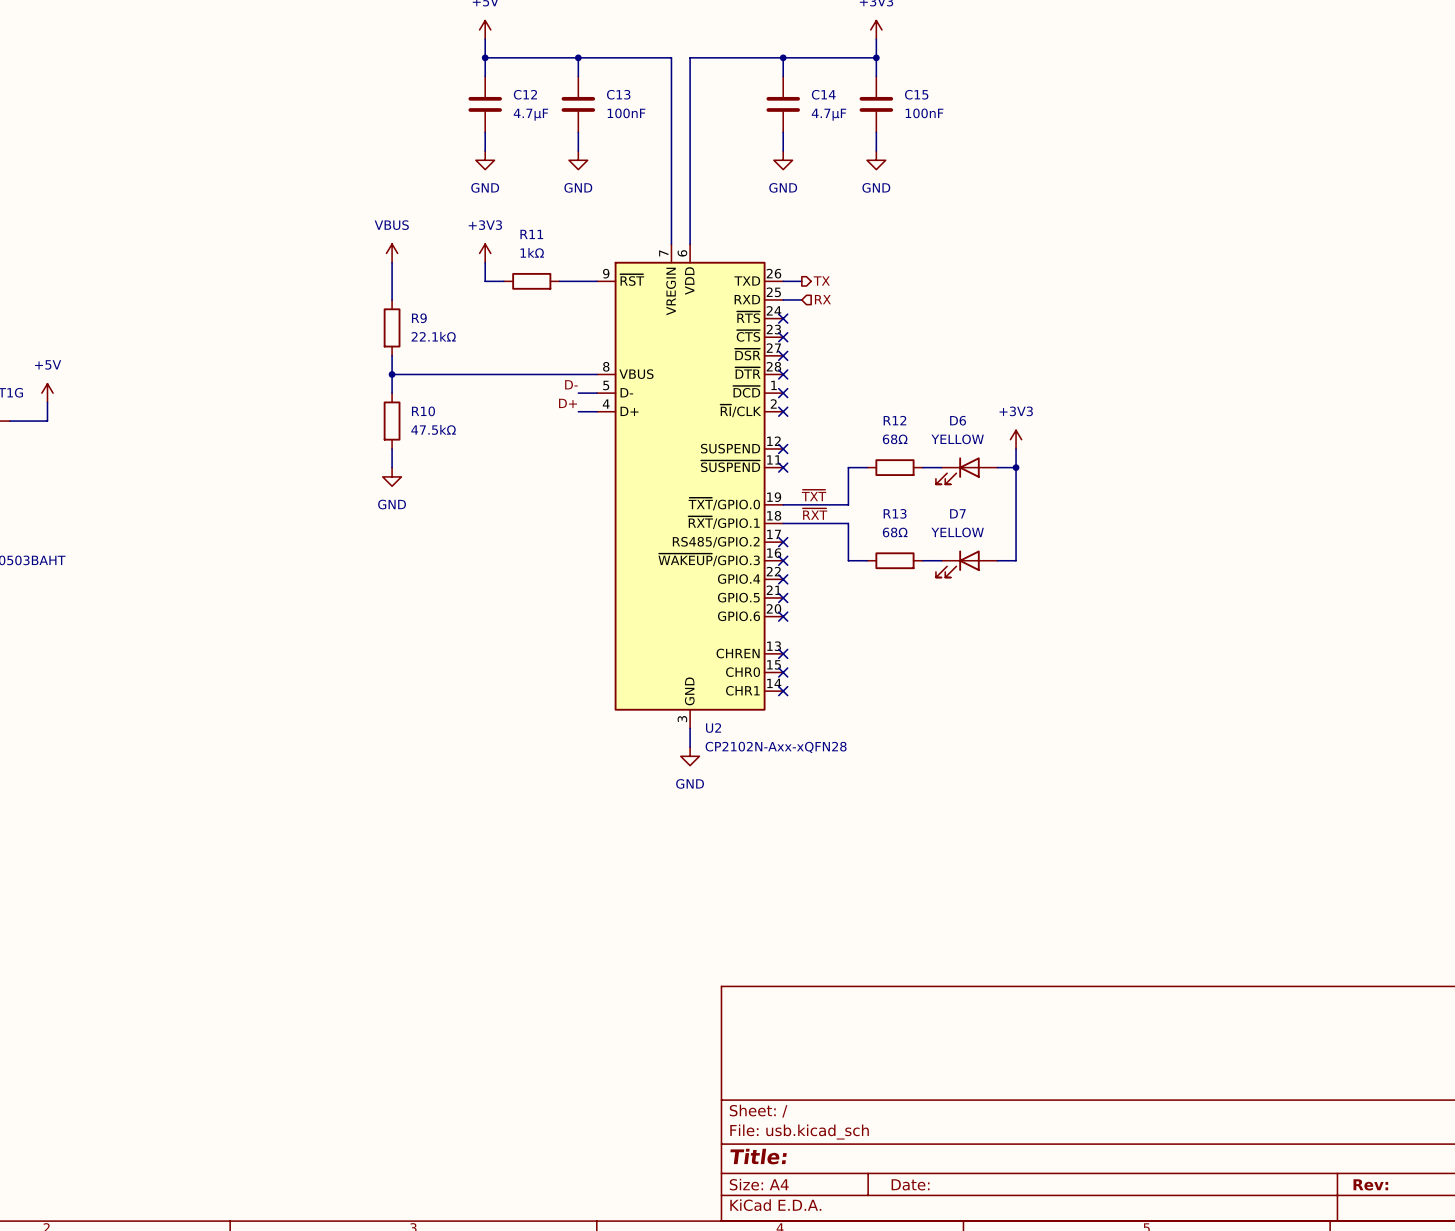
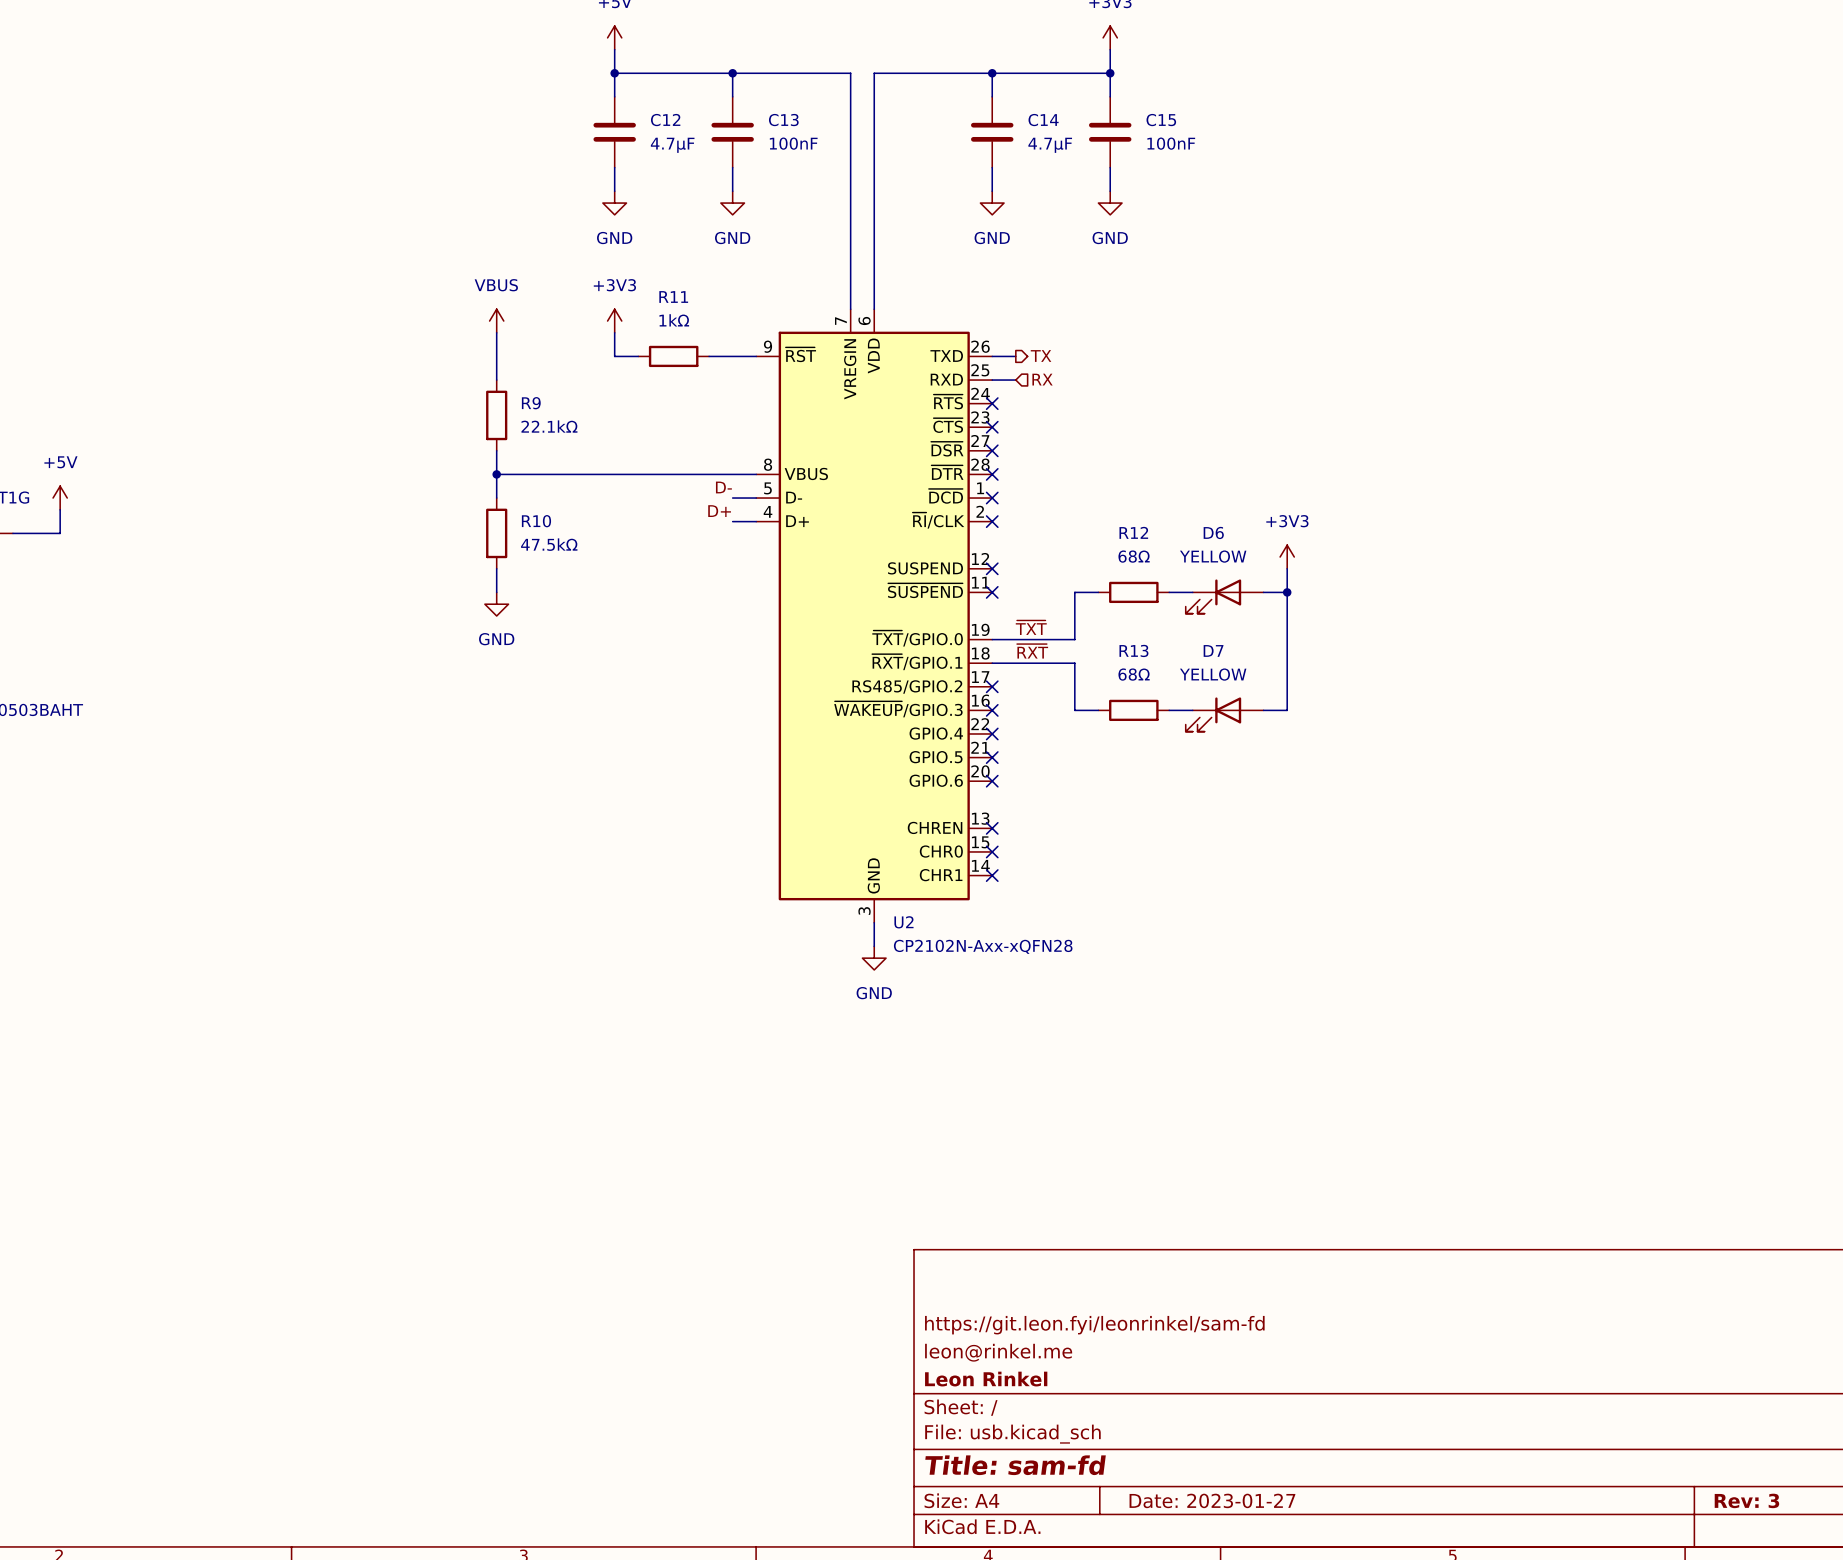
title block: none -> https://git.leon.fyi/leonrinkel/sam-fd (1094, 1325)
title block: none -> leon@rinkel.me (998, 1352)
title block: none -> Leon Rinkel (986, 1379)
title block: Title: (758, 1156) -> Title: sam-fd (1015, 1465)
title block: Date: (910, 1184) -> Date: 2023-01-27 (1212, 1500)
title block: Rev: (1370, 1184) -> Rev: 3 (1746, 1500)

